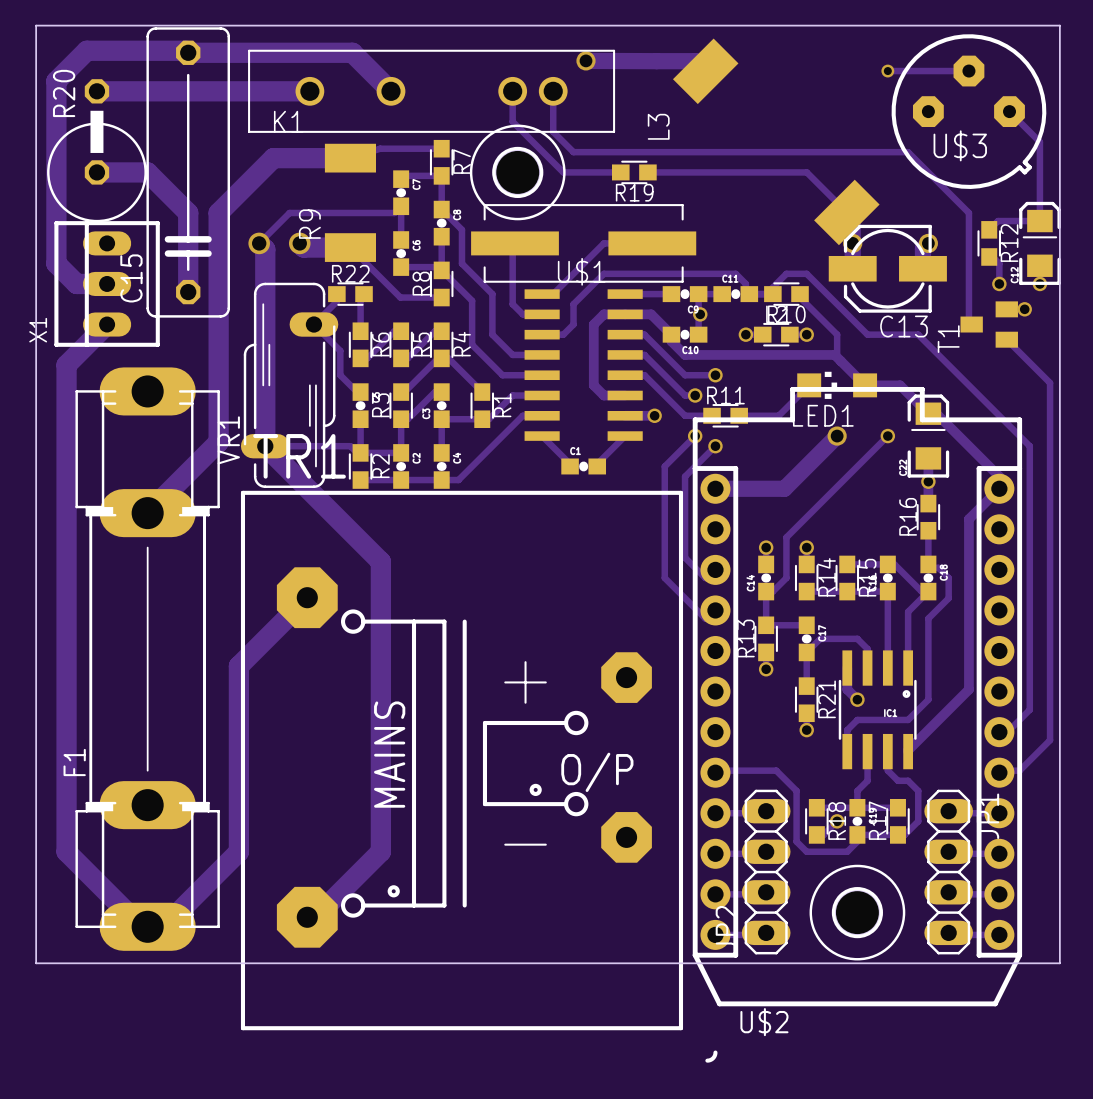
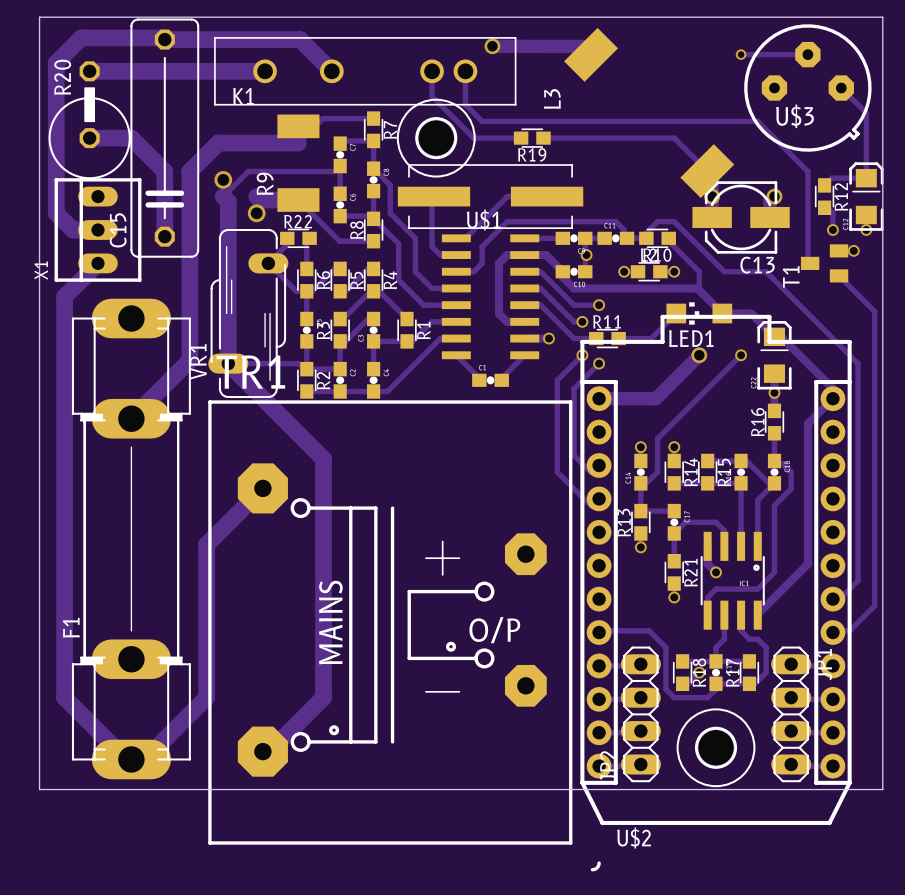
track: (380, 148) (350, 158) (273, 158) (253, 178) -> (322, 118) (298, 143) (218, 143)
via position: (259, 243) -> (223, 179)
via position: (299, 243) -> (256, 213)
track: (340, 350) (340, 375) (357, 392) (360, 392) -> (290, 285) (296, 291) (306, 291) (306, 319)

